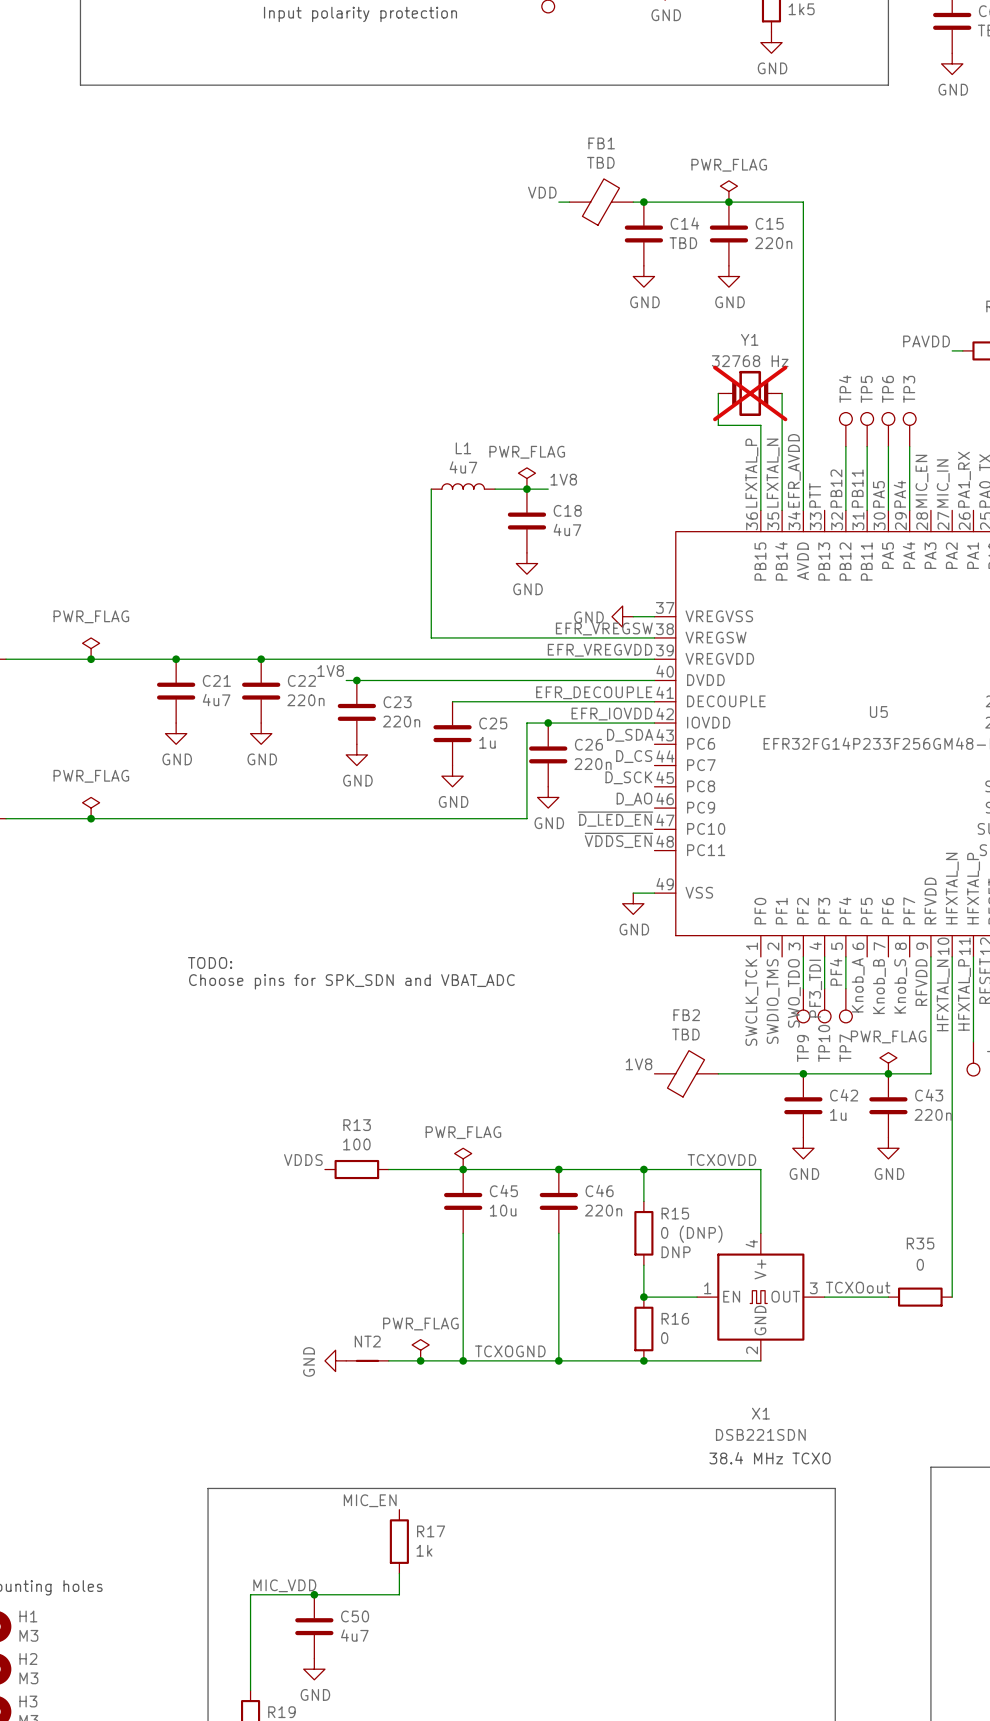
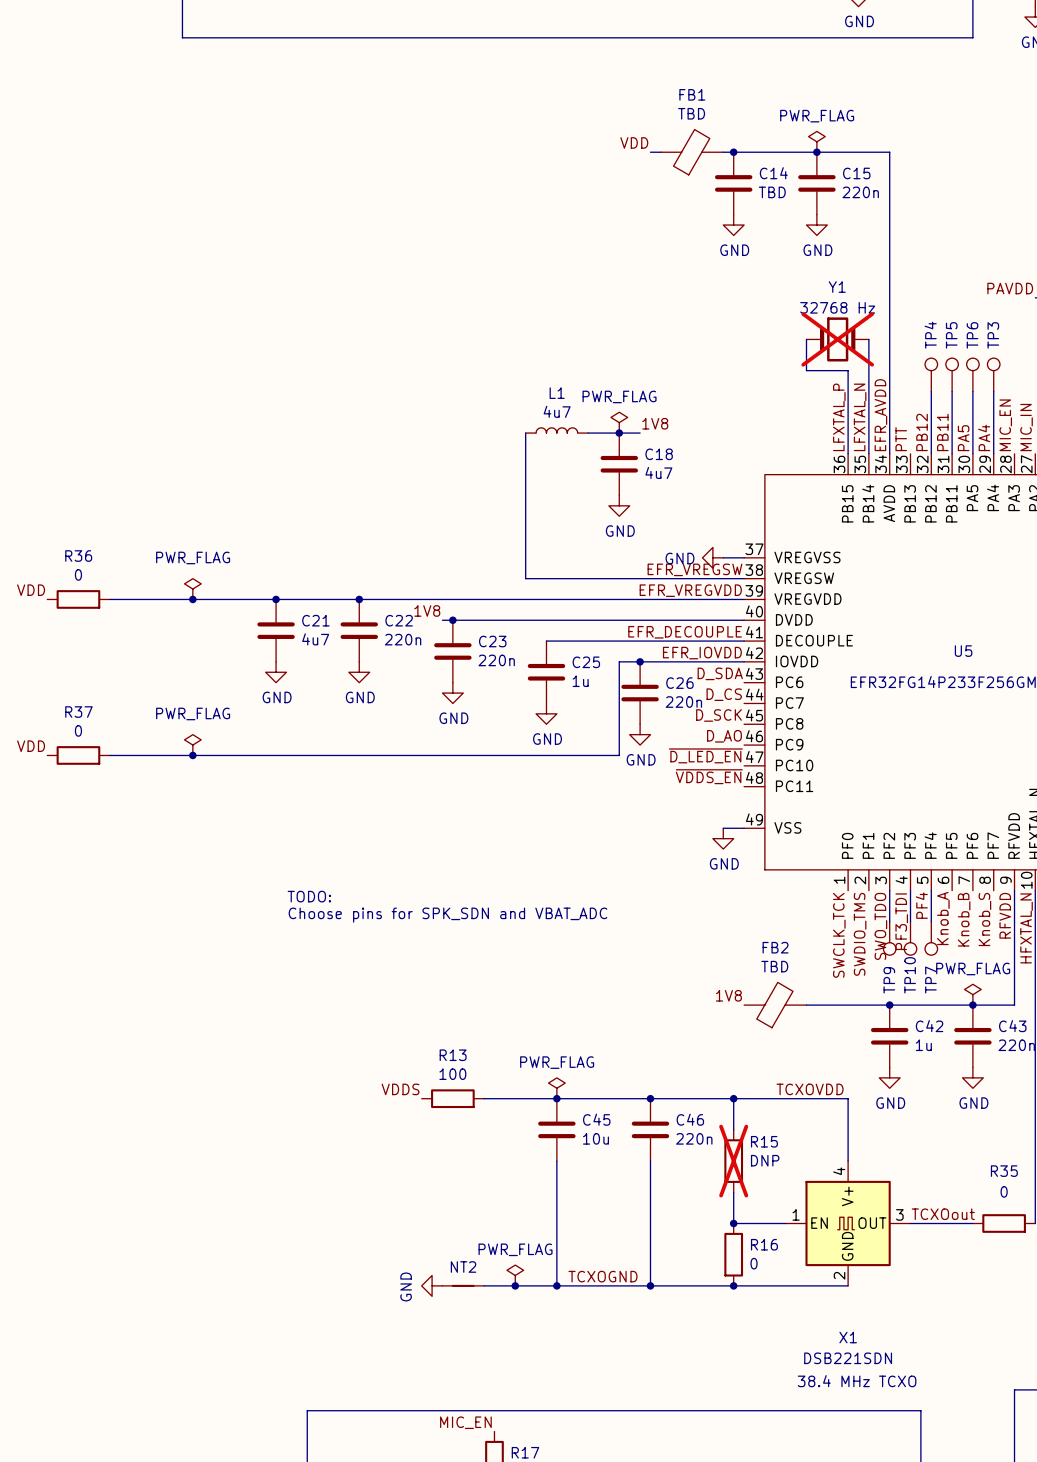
R15 do-not-place cross: none -> (733, 1161)
R15 value: 0 (DNP) (691, 1234) -> DNP (765, 1160)
R15 text: DNP (676, 1252) -> none

